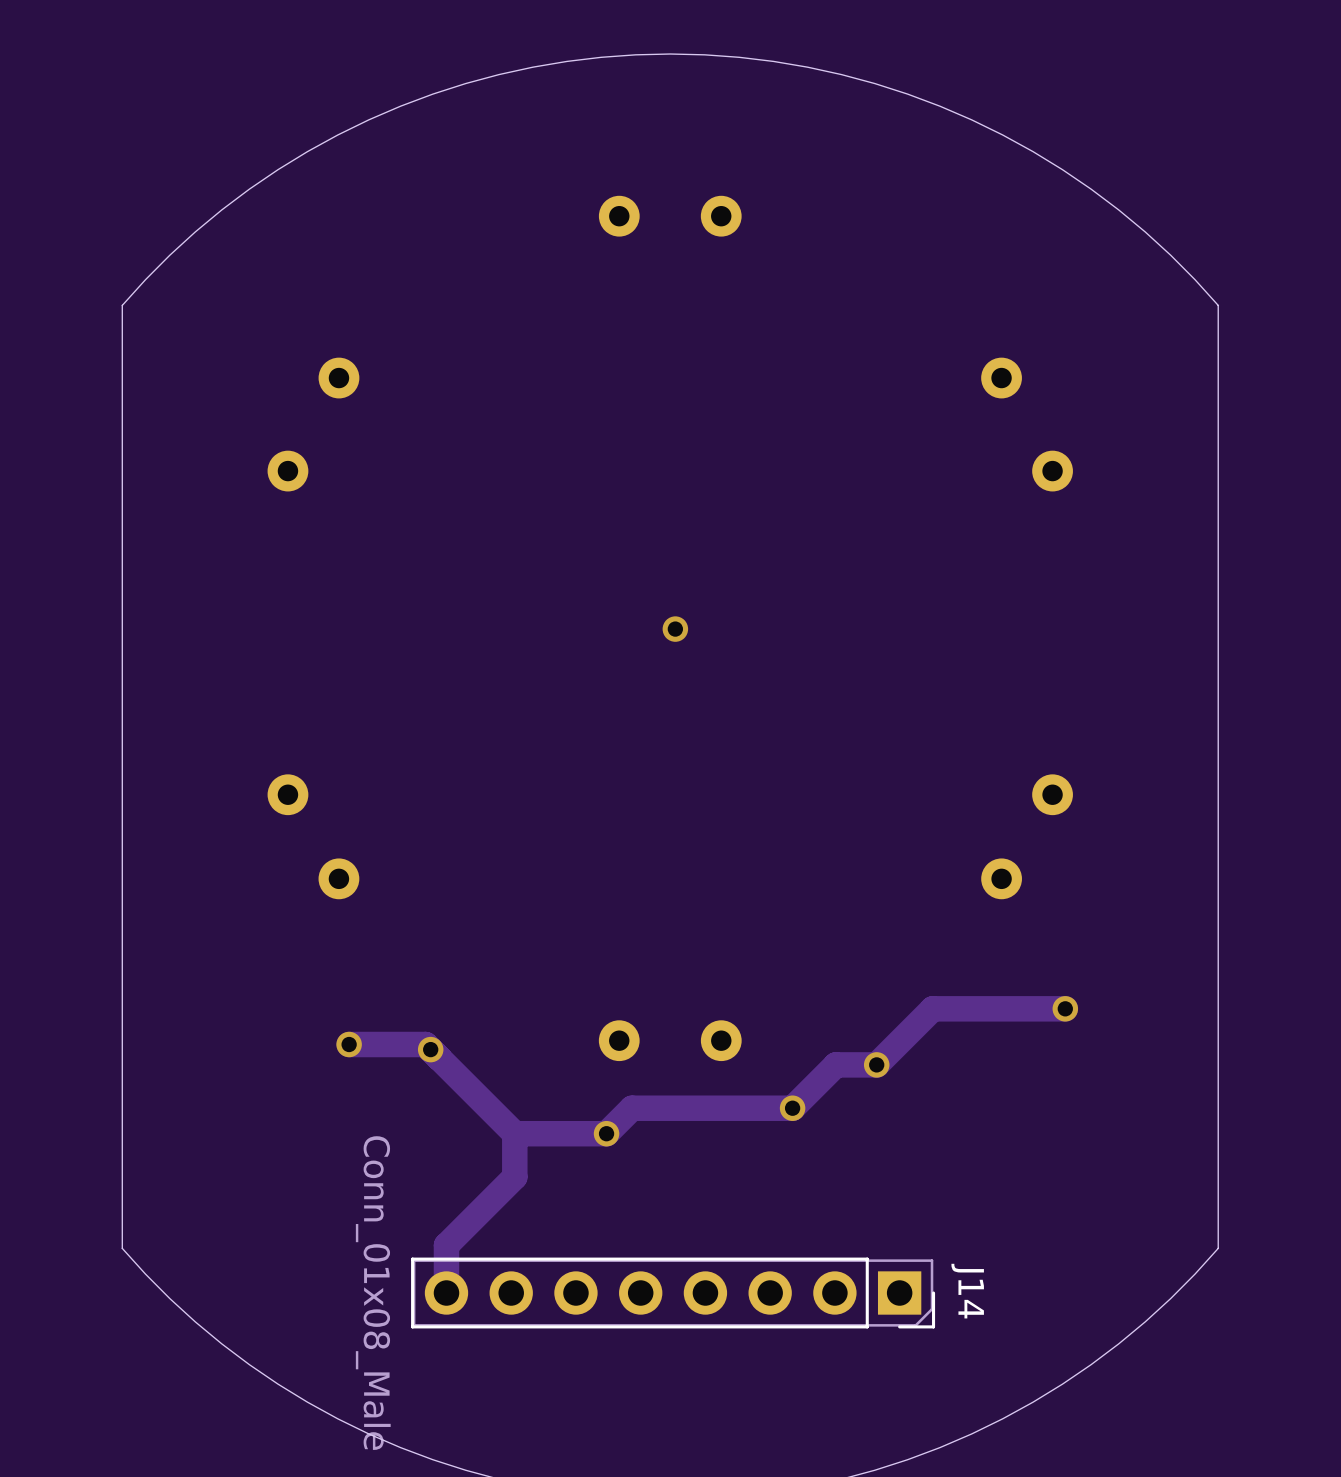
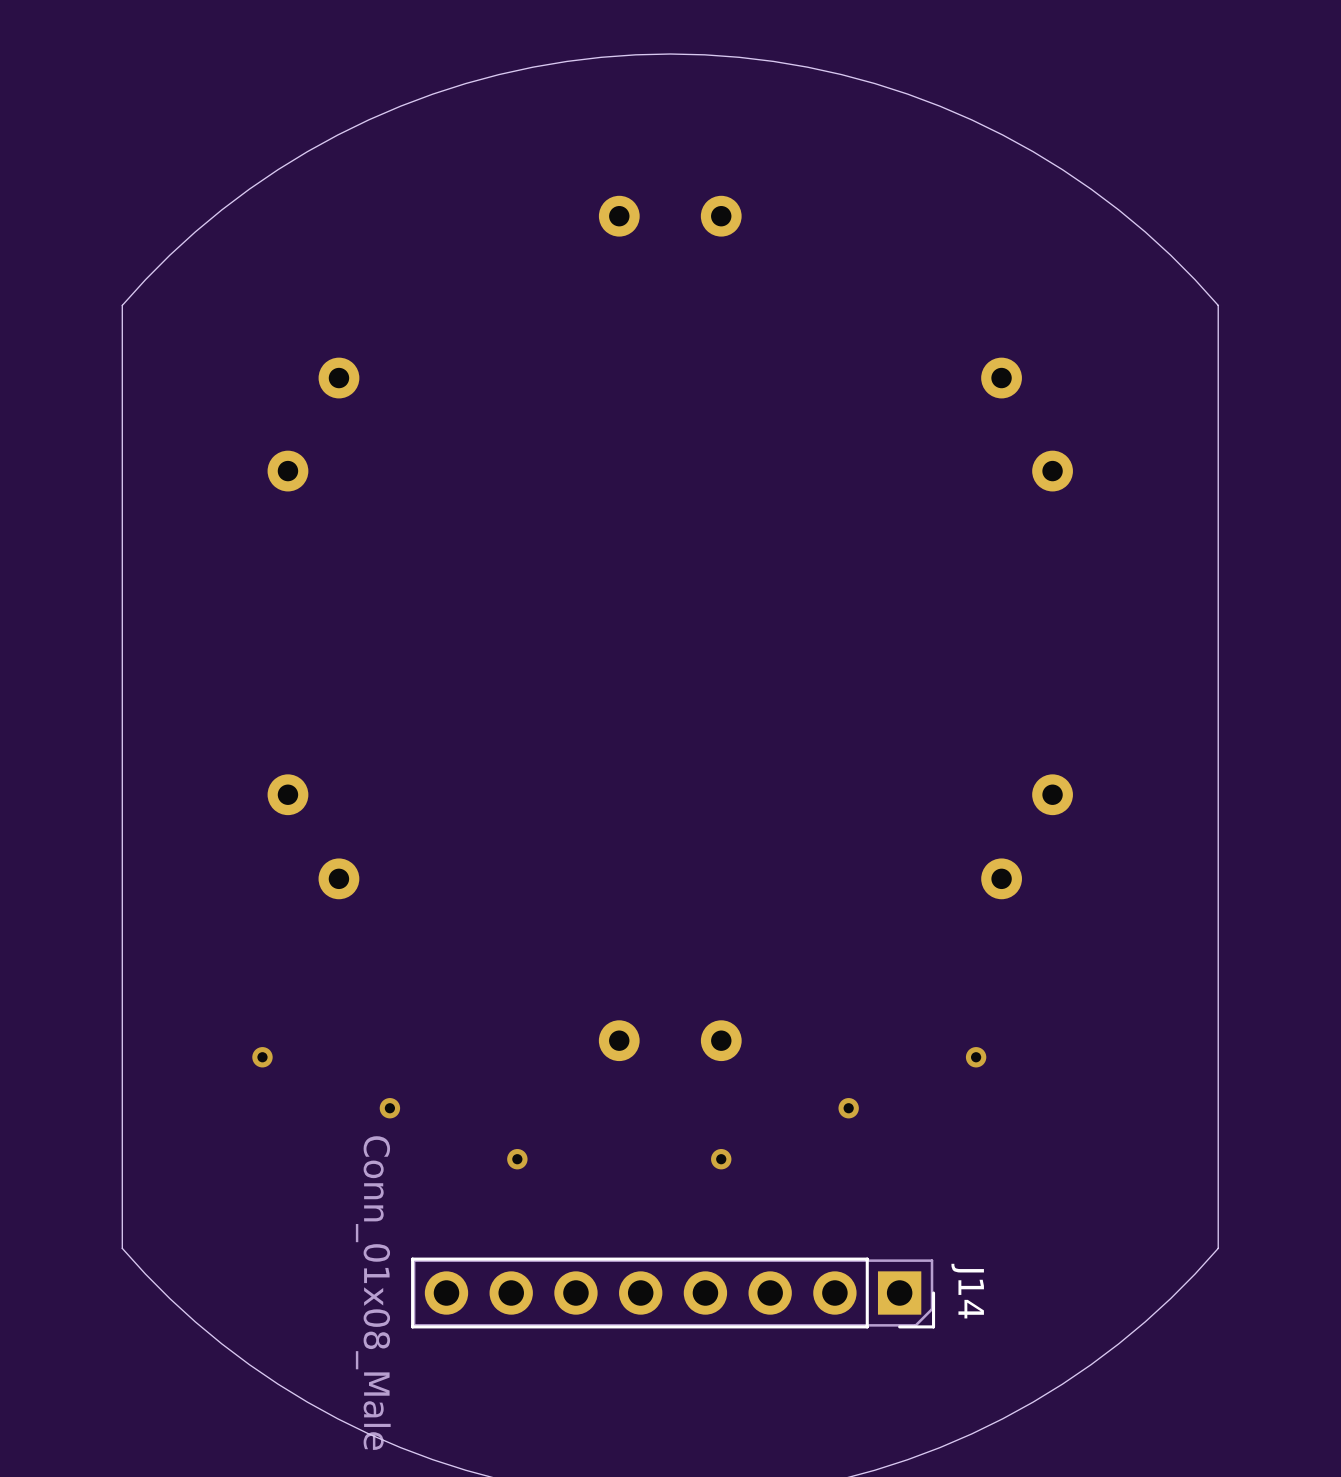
via: (675, 629) -> none
track: (1065, 1008) (932, 1008) (876, 1064) (835, 1064) (792, 1108) (632, 1108) (606, 1133) (514, 1133) -> none
via: (1065, 1008) -> none
track: (349, 1044) (425, 1044) (514, 1133) -> none
via: (349, 1044) -> none
via: (430, 1049) -> none
via: none -> (262, 1057)
via: none -> (976, 1057)
via: (876, 1064) -> none
via: none -> (389, 1108)
via: (792, 1108) -> none
via: none -> (848, 1108)
track: (514, 1133) (514, 1177) (446, 1245) (446, 1293) -> none
via: (606, 1133) -> none
via: none -> (517, 1159)
via: none -> (721, 1159)

